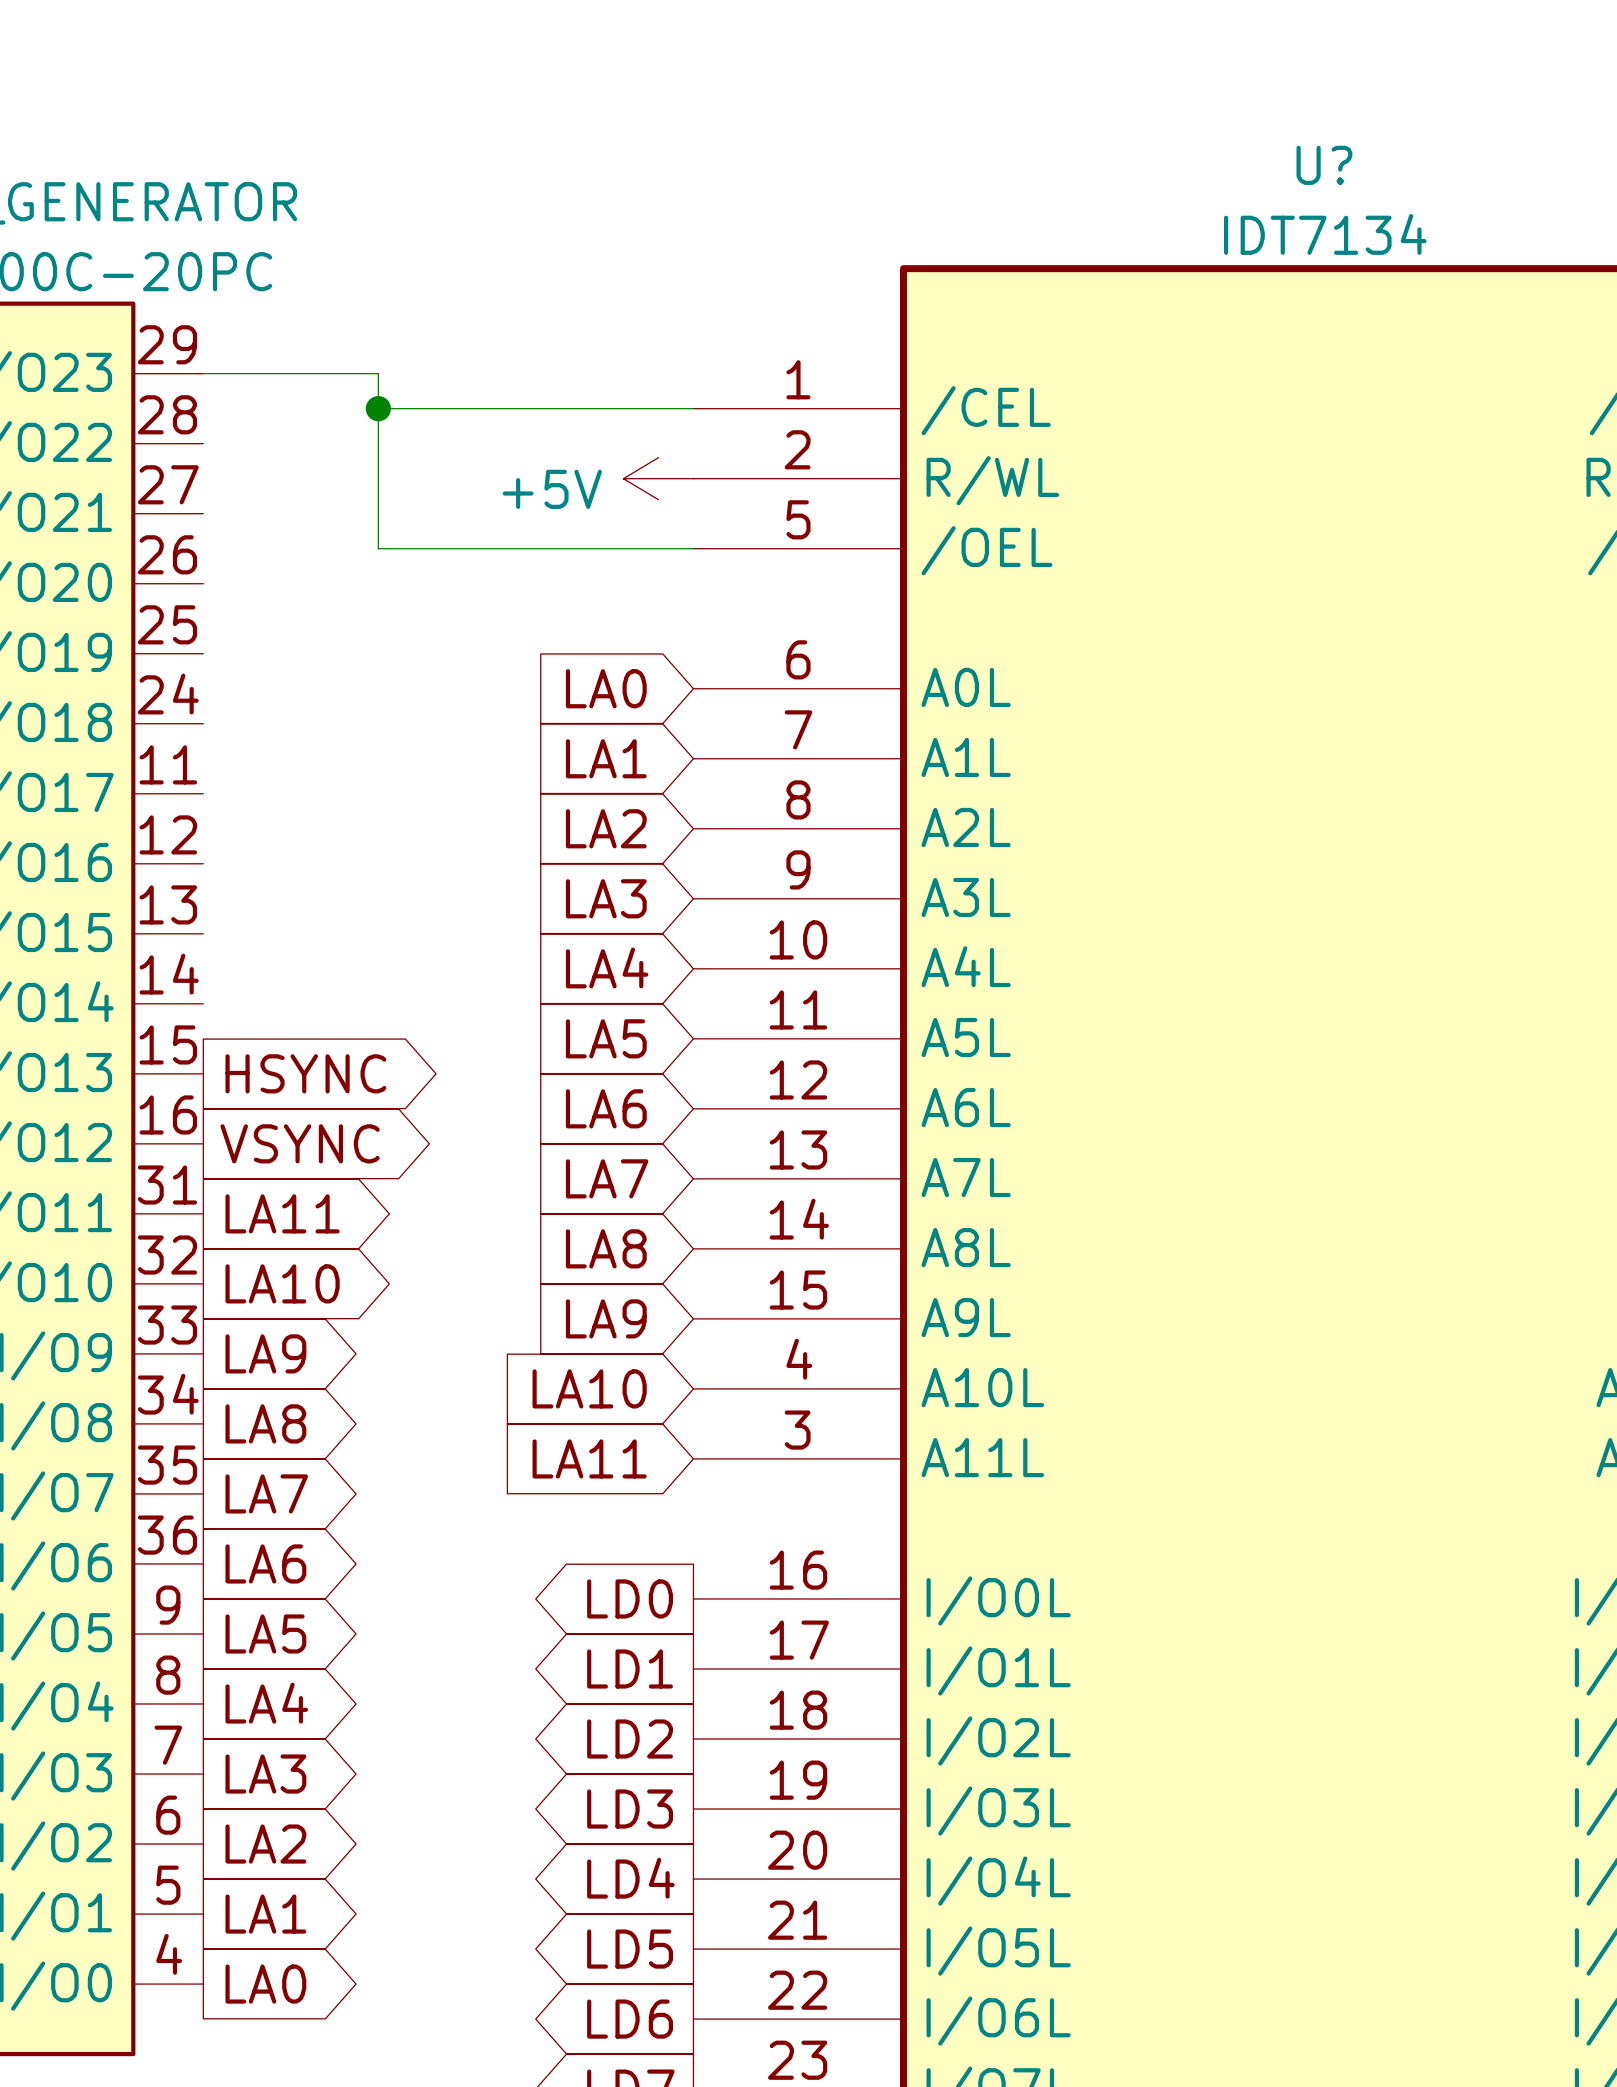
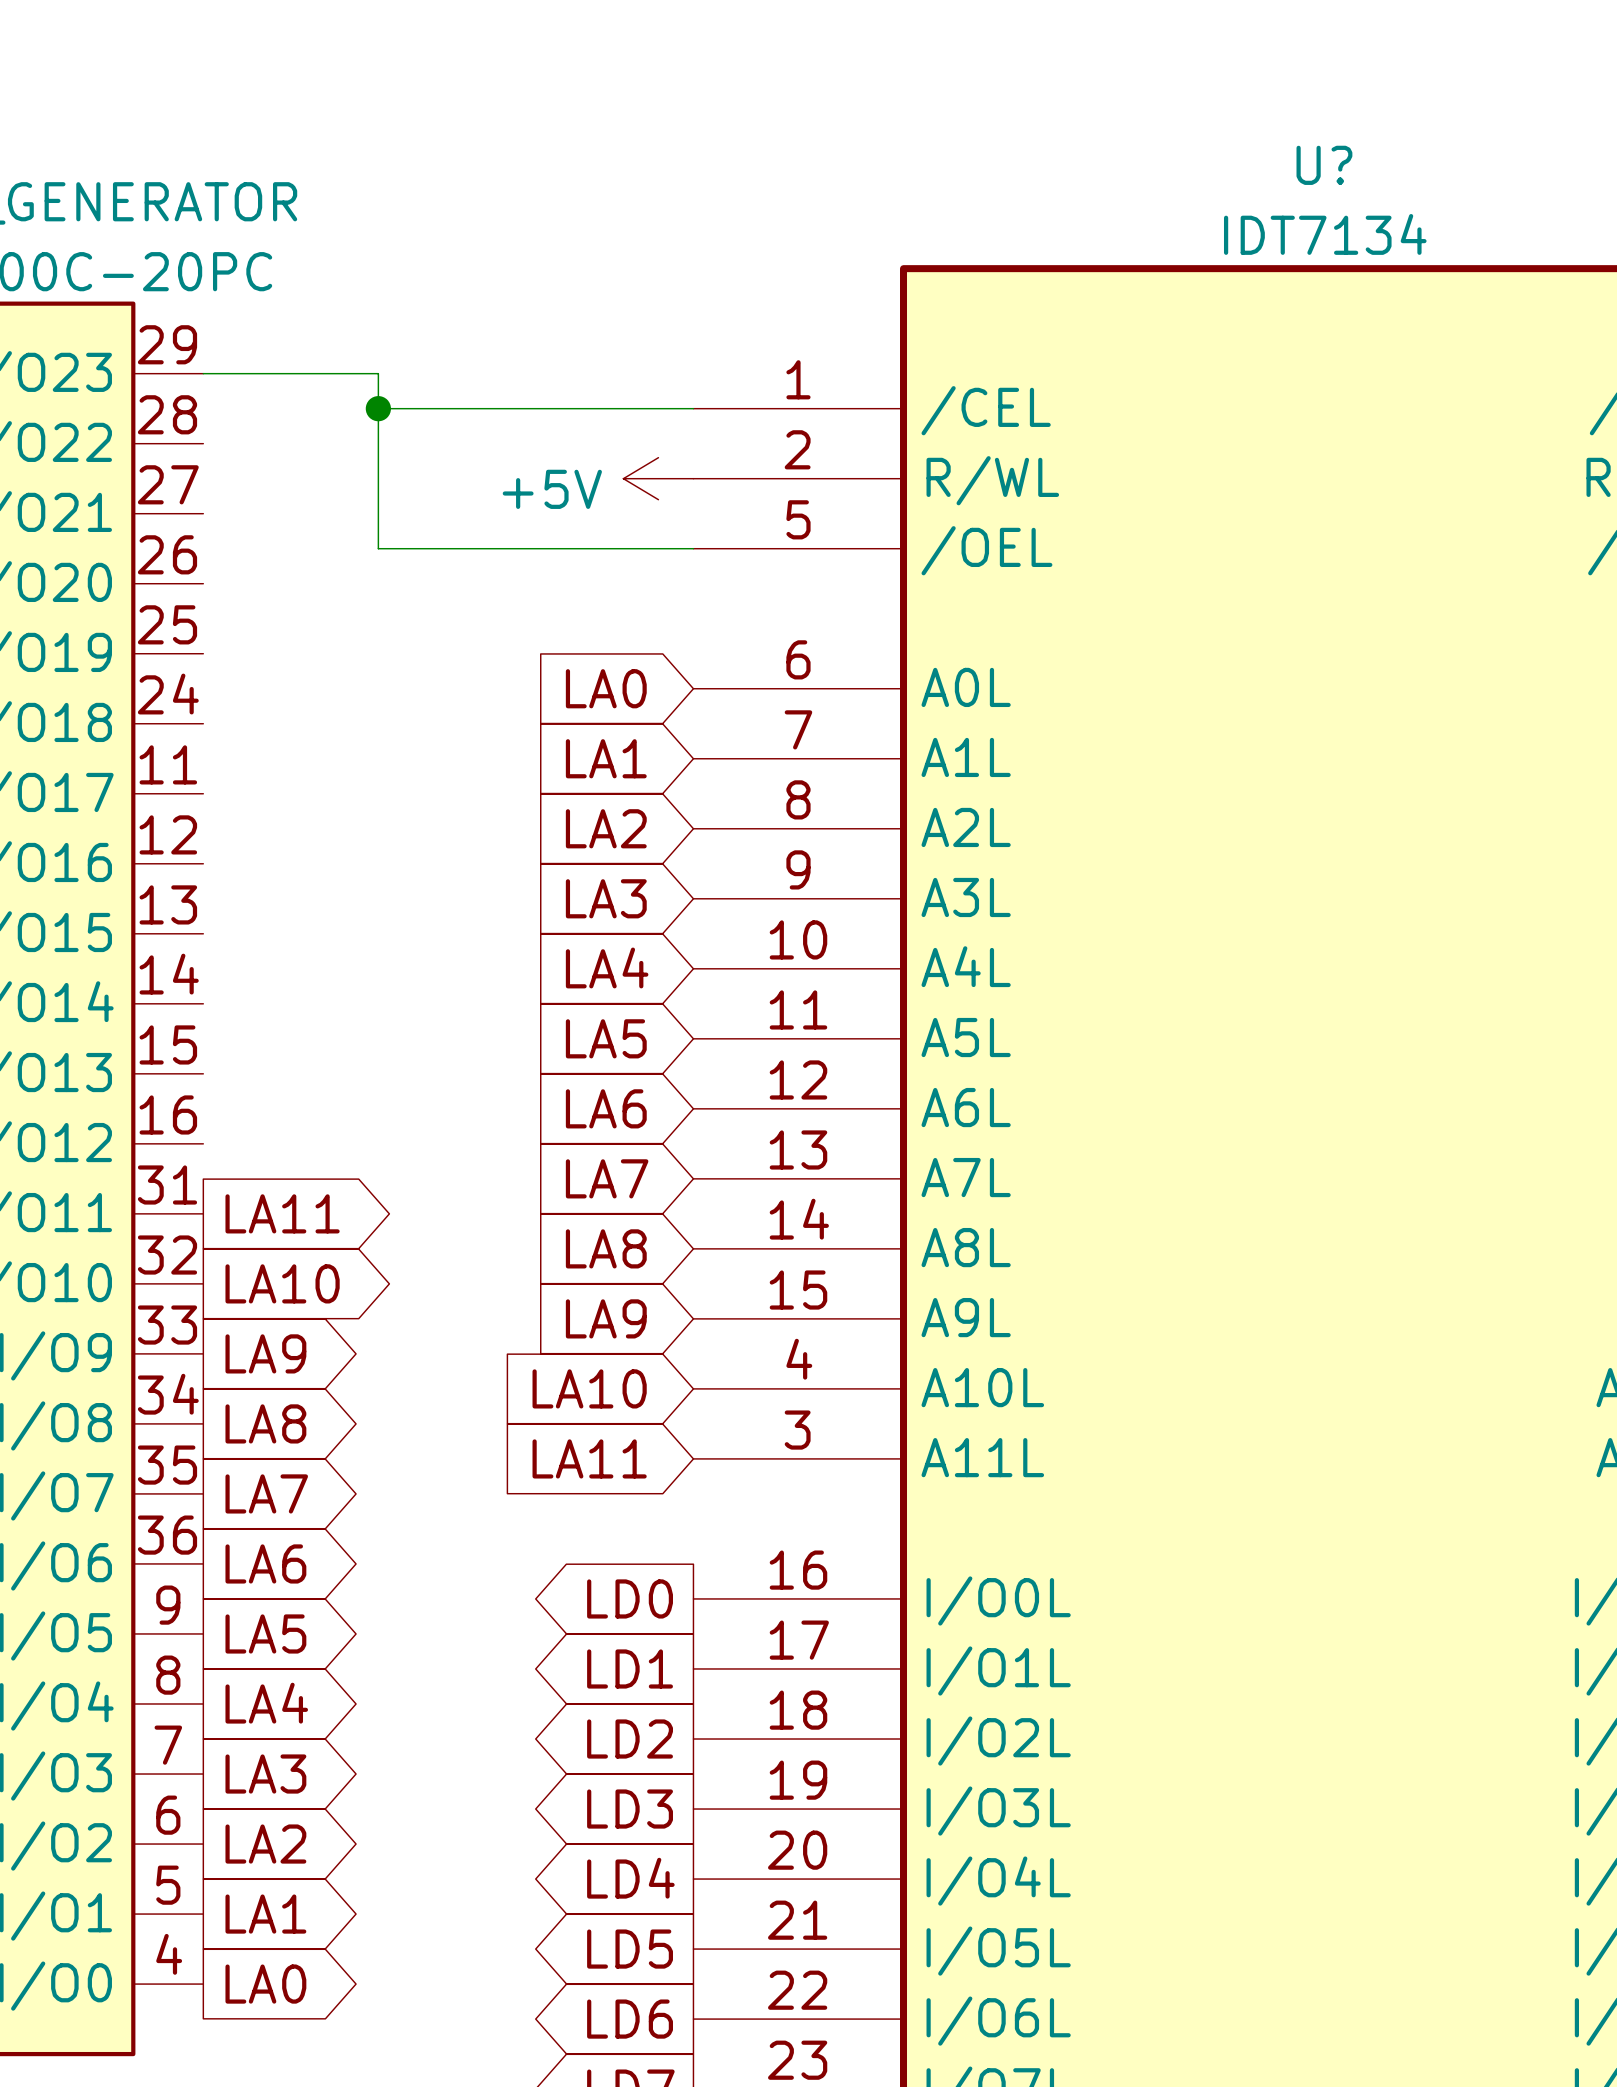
global label: HSYNC (305, 1073) -> none
global label: VSYNC (300, 1143) -> none

